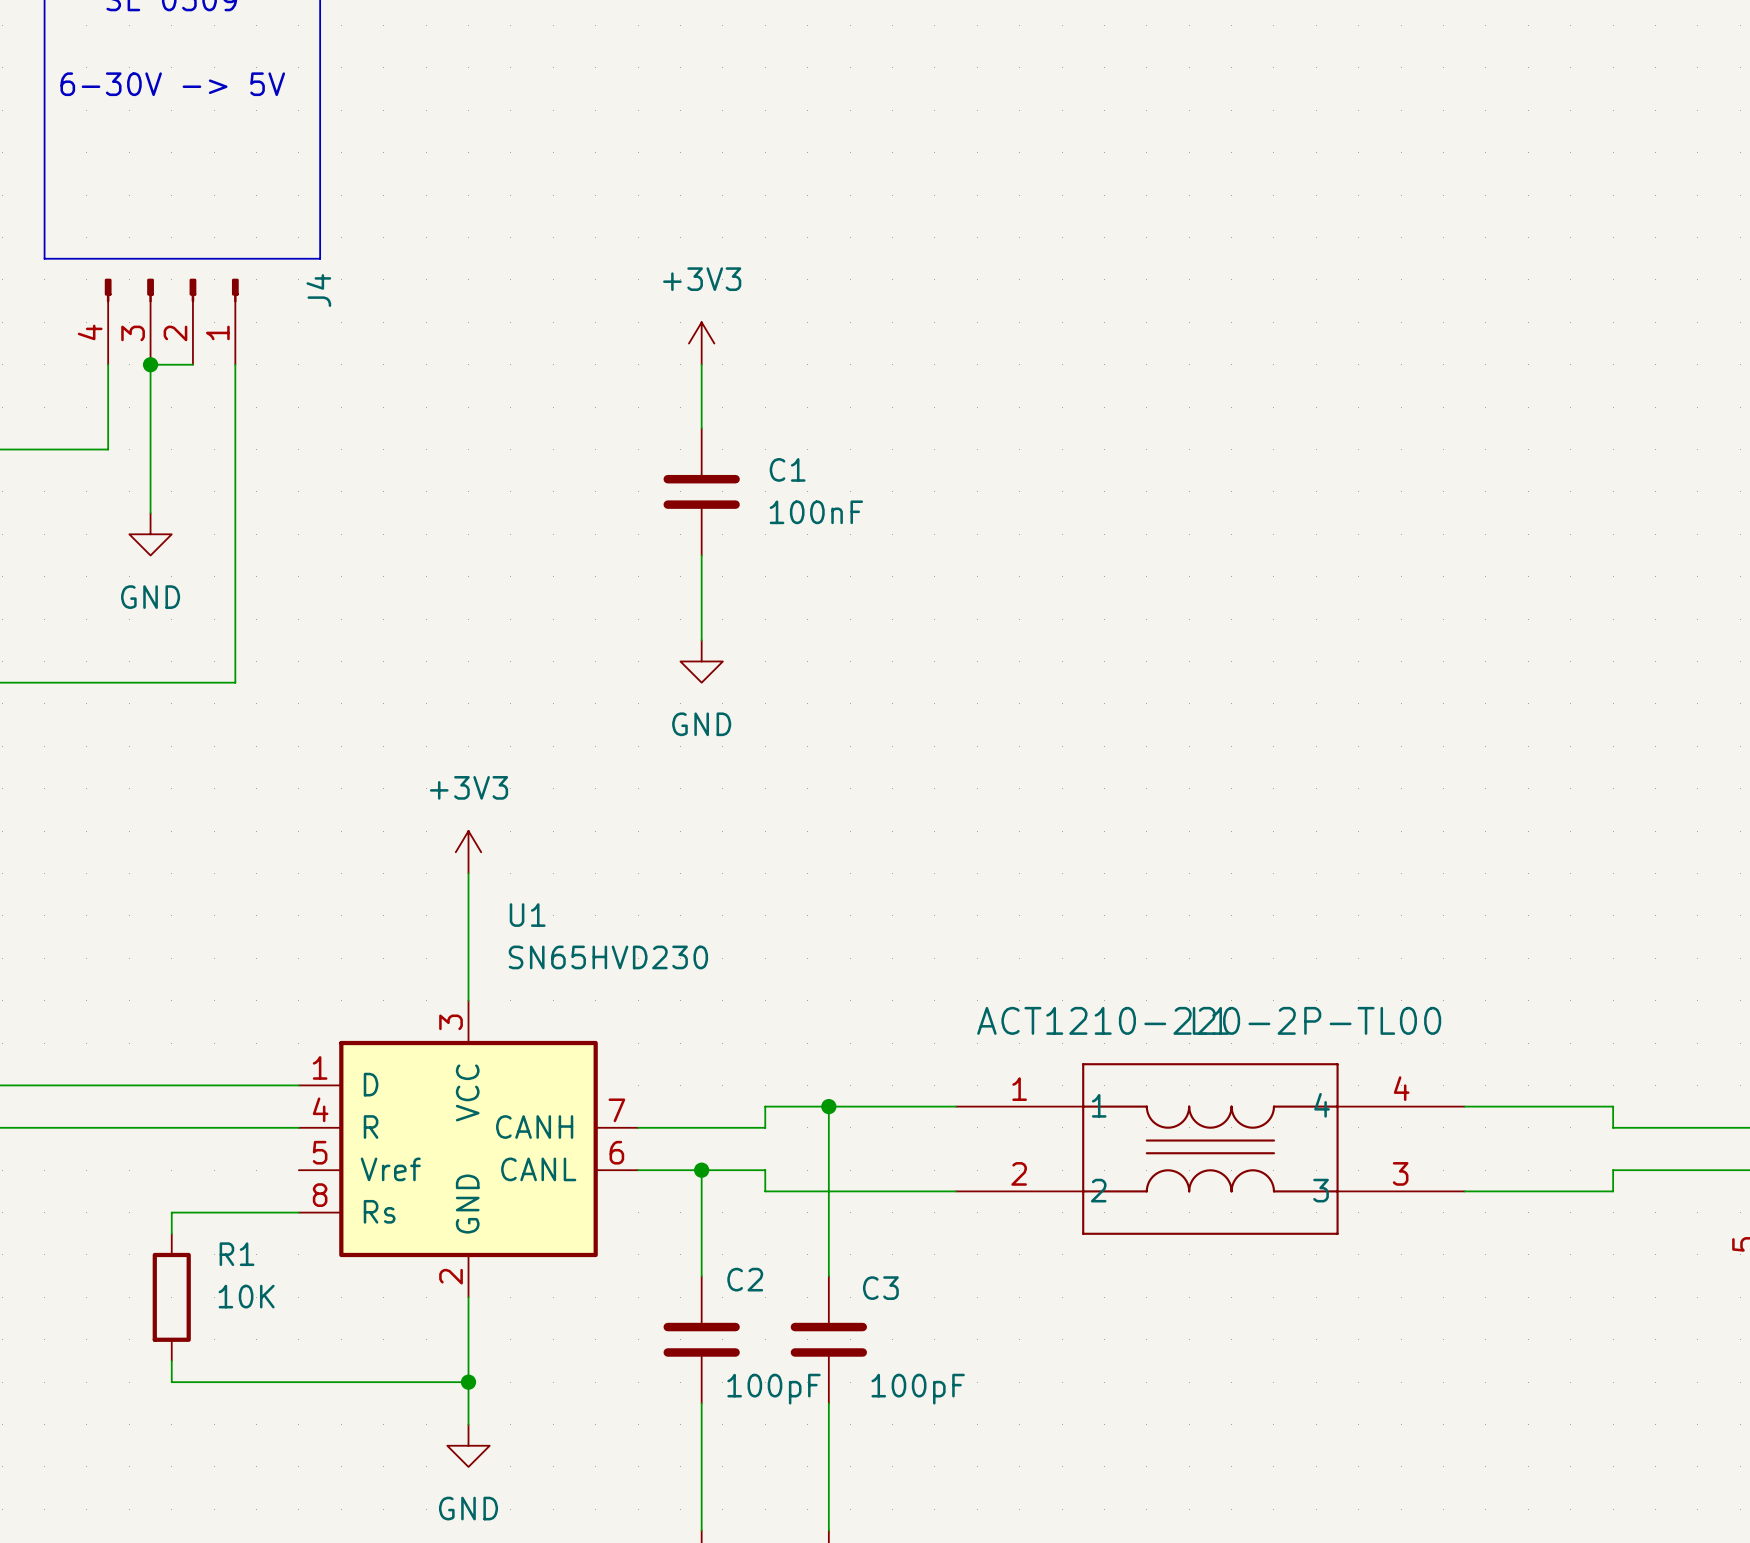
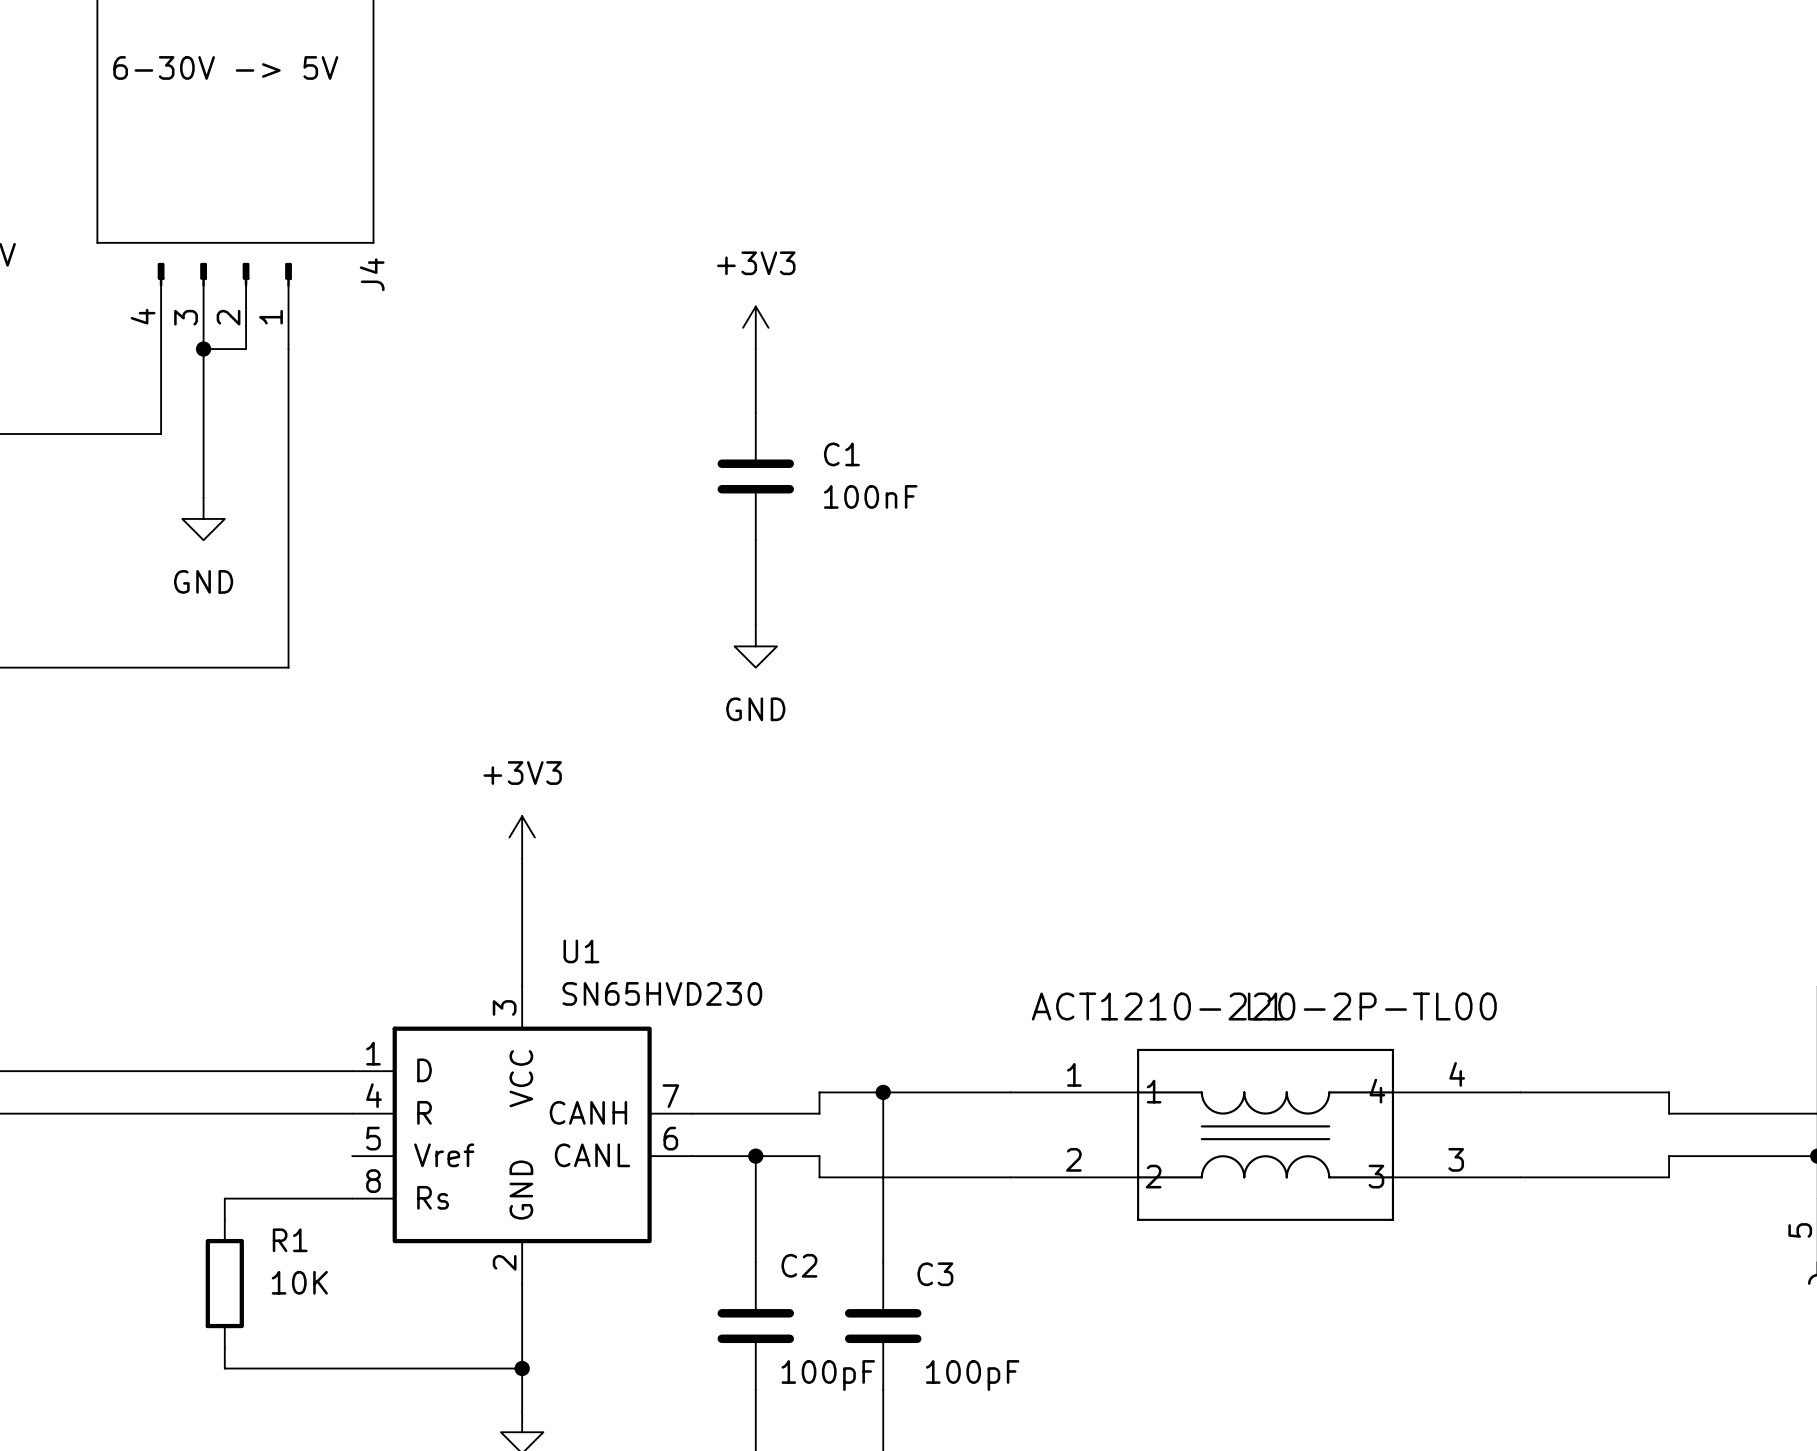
U1 name position: U1 (527, 915) -> U1 (581, 951)
U1 value position: SN65HVD230 (608, 957) -> SN65HVD230 (662, 993)

